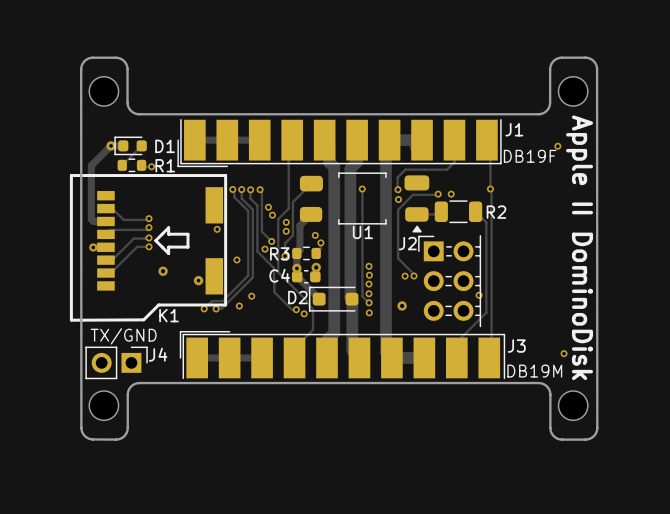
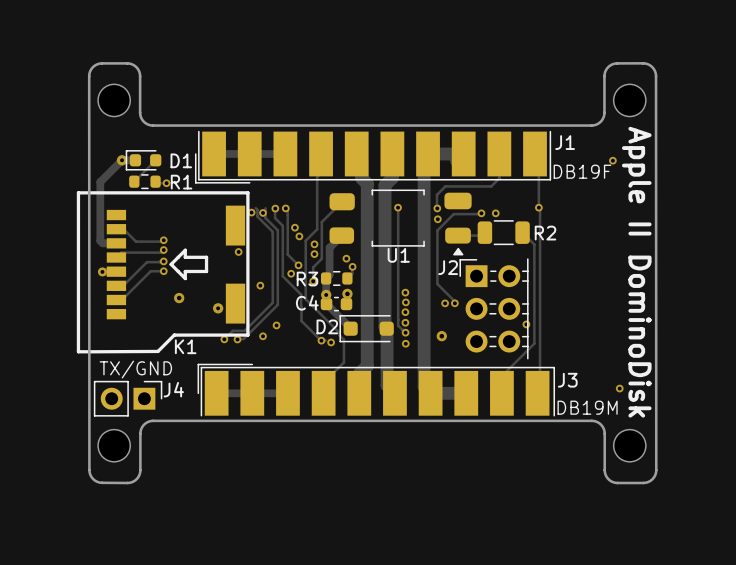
via: (232, 189) -> none
via: (241, 189) -> none
via: none -> (251, 212)
via: none -> (262, 212)
via: (296, 309) -> none
via: none -> (321, 340)
via: none -> (331, 342)
via: (304, 313) -> none

